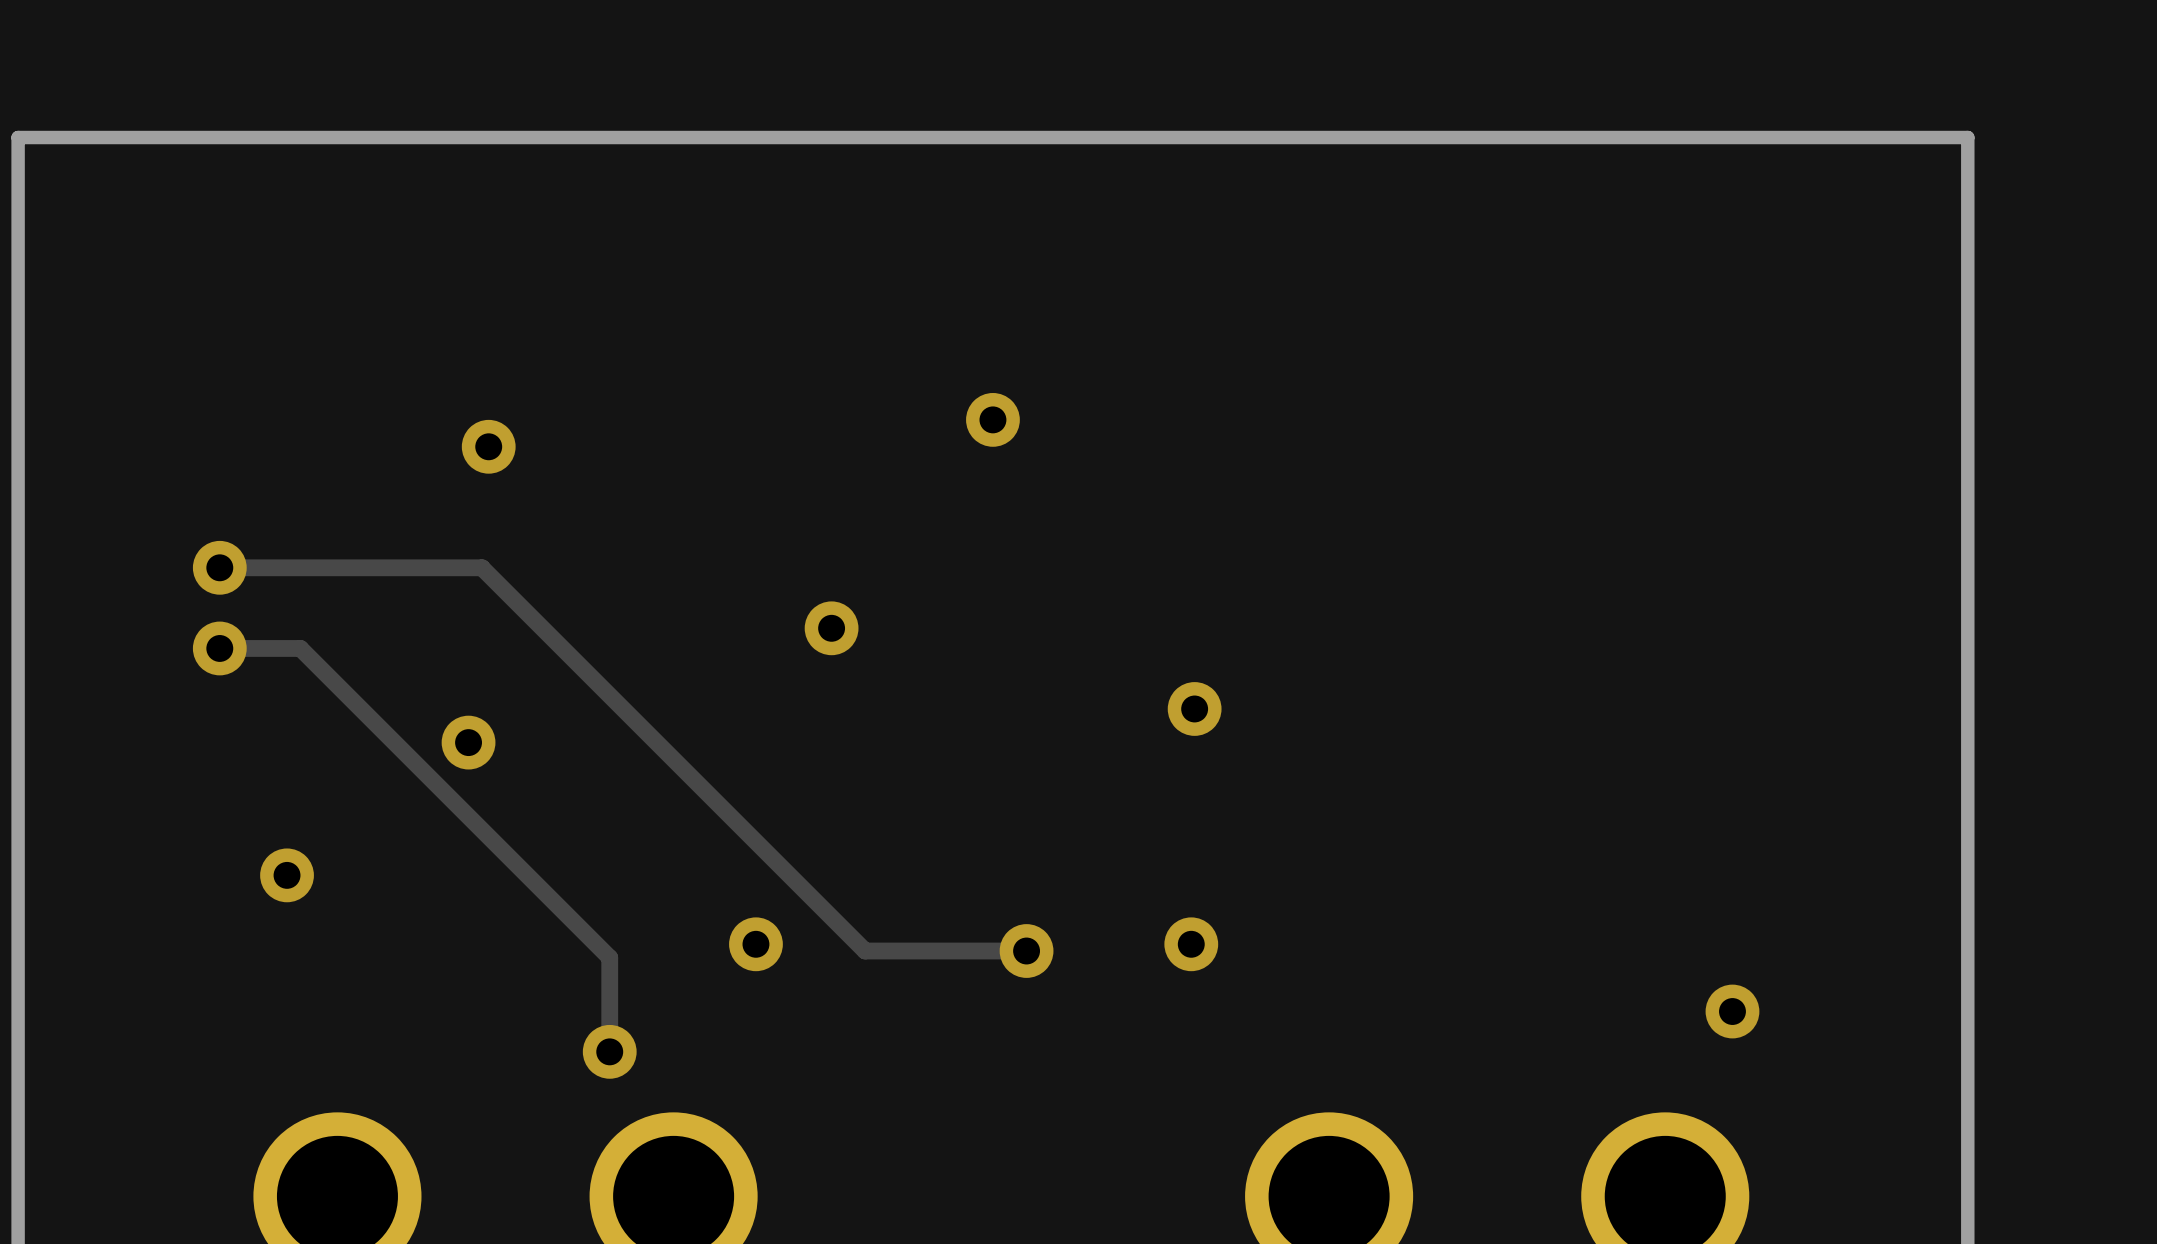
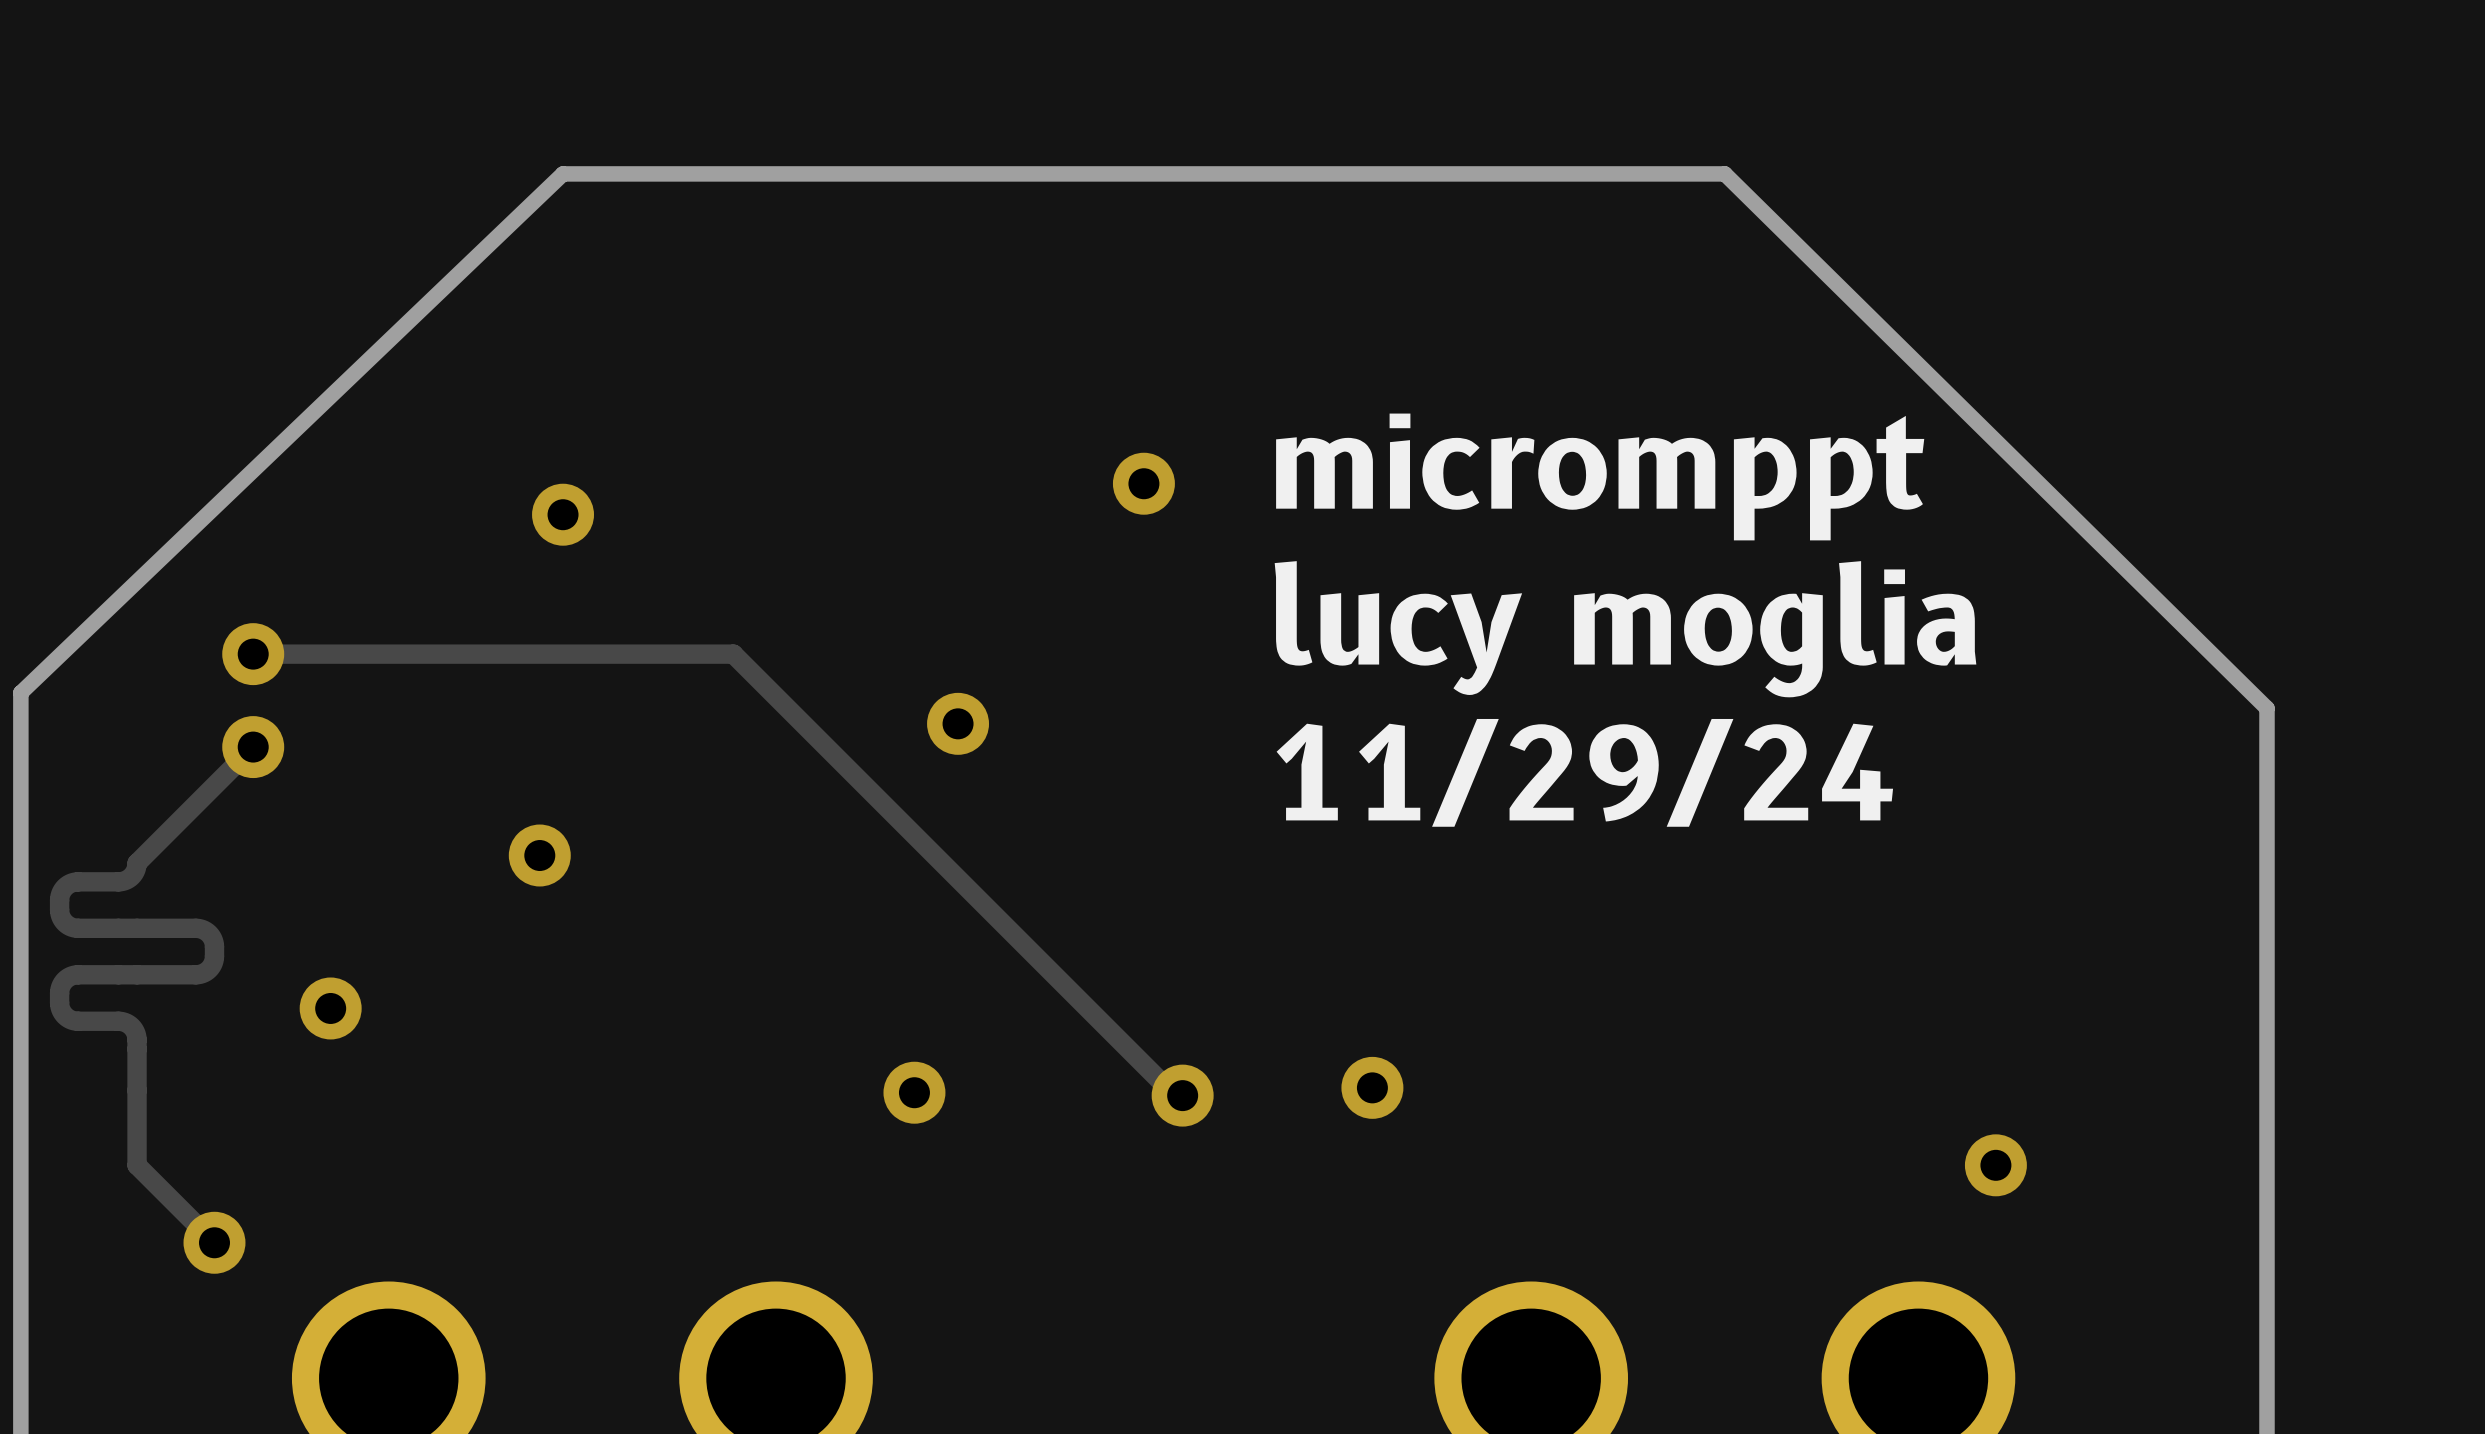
text: none -> micromppt (1600, 476)
text: none -> lucy moglia (1625, 629)
track: (482, 567) (865, 951) (1019, 951) -> (555, 654) (733, 654) (1174, 1095)
board edge: (18, 601) (18, 137) (1967, 137) (1967, 614) -> (20, 692) (563, 173) (1724, 173) (2266, 708)
track: (219, 648) (300, 648) (609, 957) (609, 1051) -> (253, 747) (137, 863) (135, 871) (130, 877) (120, 881) (72, 882) (63, 888) (59, 898) (61, 917) (66, 924) (74, 927) (197, 928) (207, 932) (212, 938) (214, 960) (210, 967) (203, 972) (195, 974) (74, 975) (66, 978) (61, 985) (59, 1002) (62, 1012) (72, 1020) (120, 1021) (128, 1024) (134, 1029) (137, 1039) (137, 1165) (214, 1242)
text: none -> 11/29/24 (1584, 772)
via: (1194, 708) -> none
via position: (755, 944) -> (914, 1092)
via: (609, 1051) -> none
via: none -> (214, 1242)

